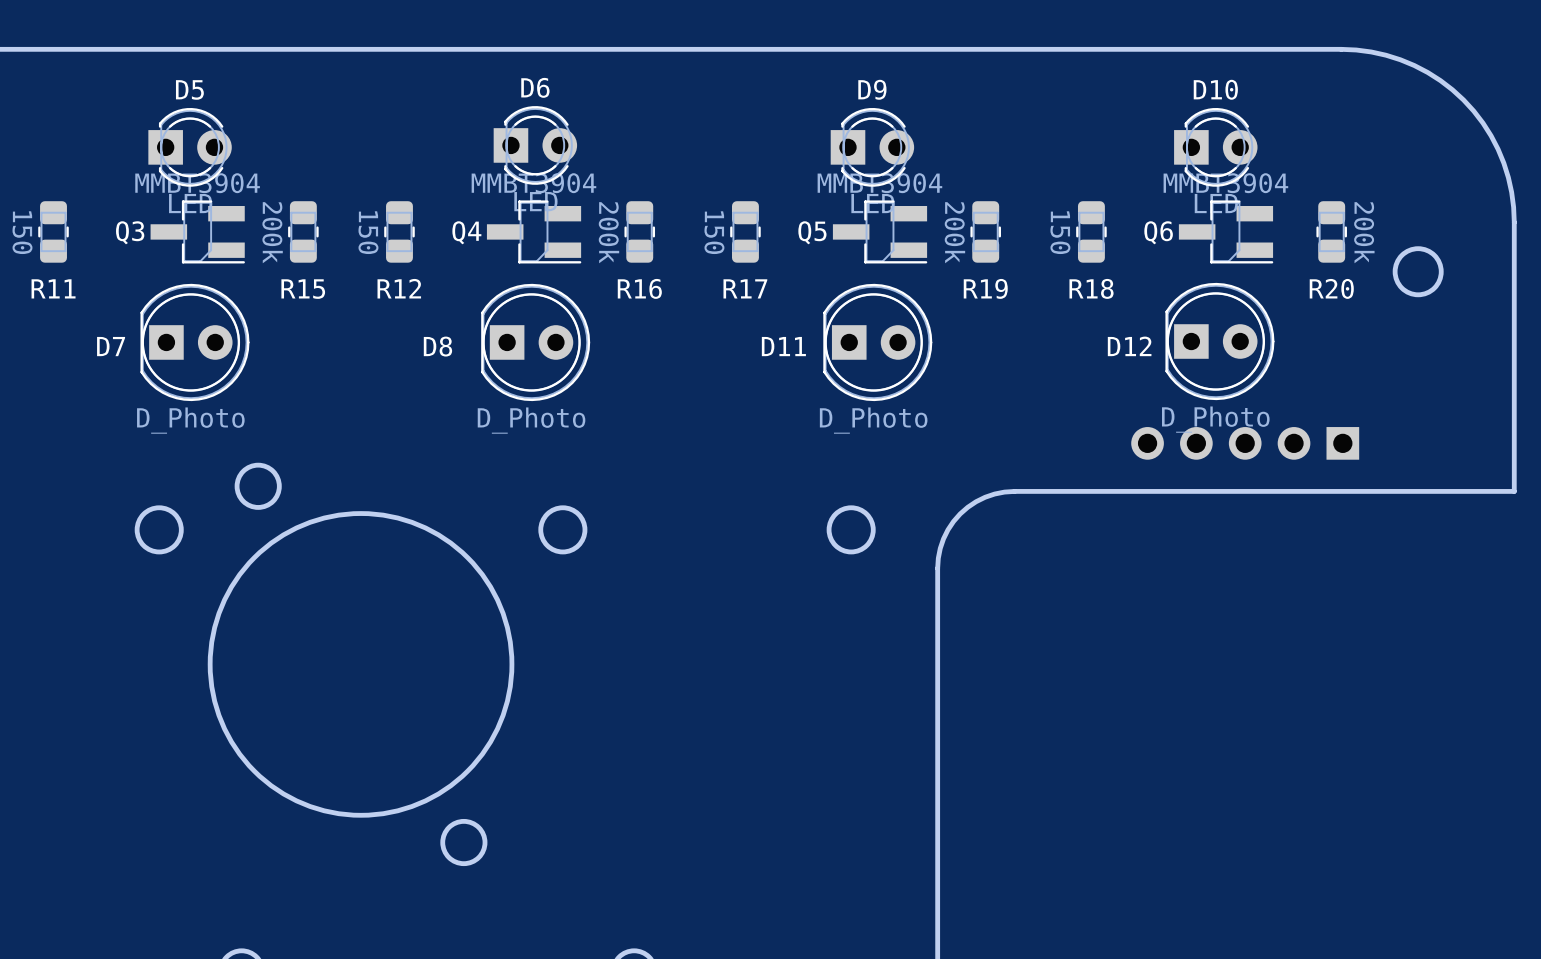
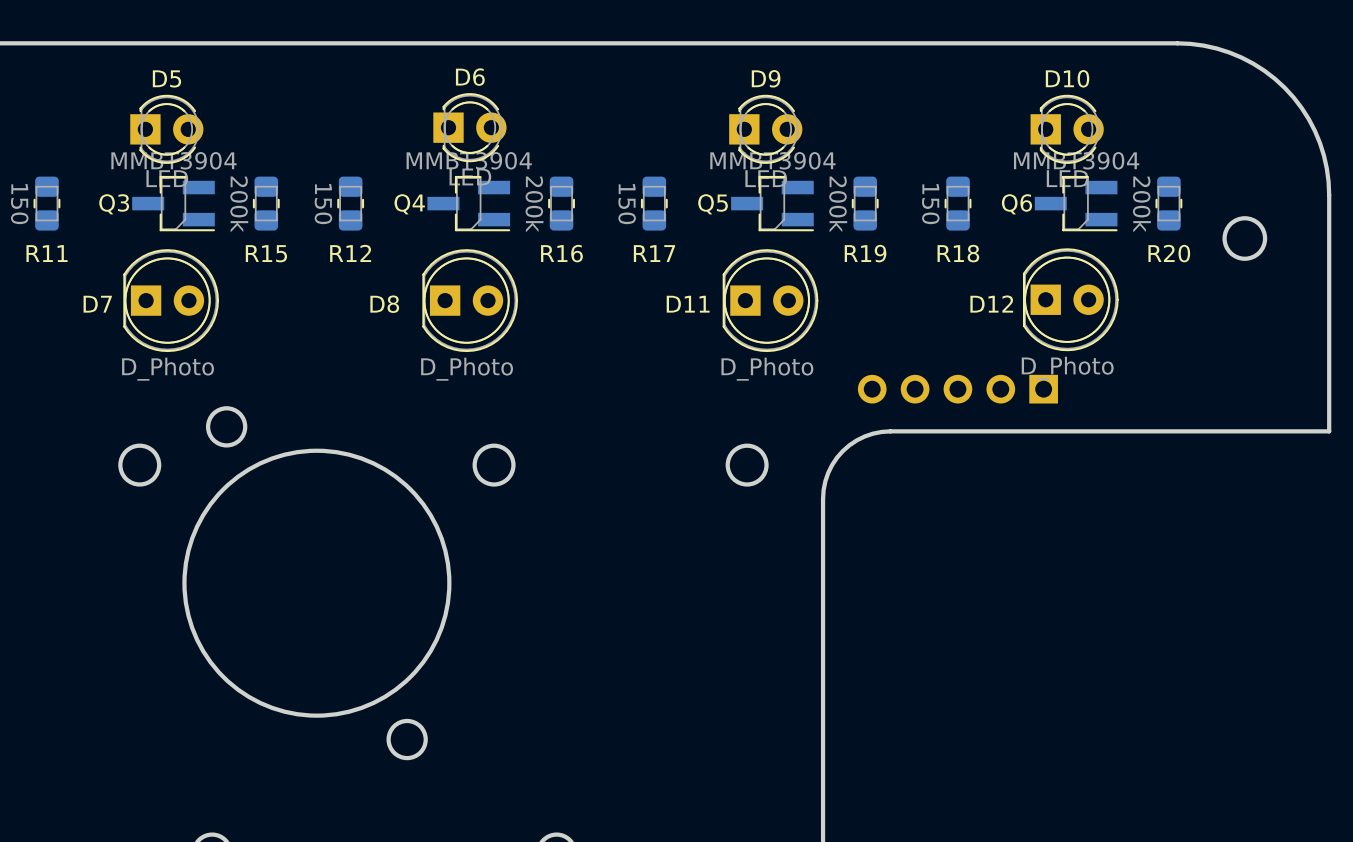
R20 value position: 200k (1364, 232) -> 200k (1141, 204)
part position: (1245, 443) -> (957, 389)

